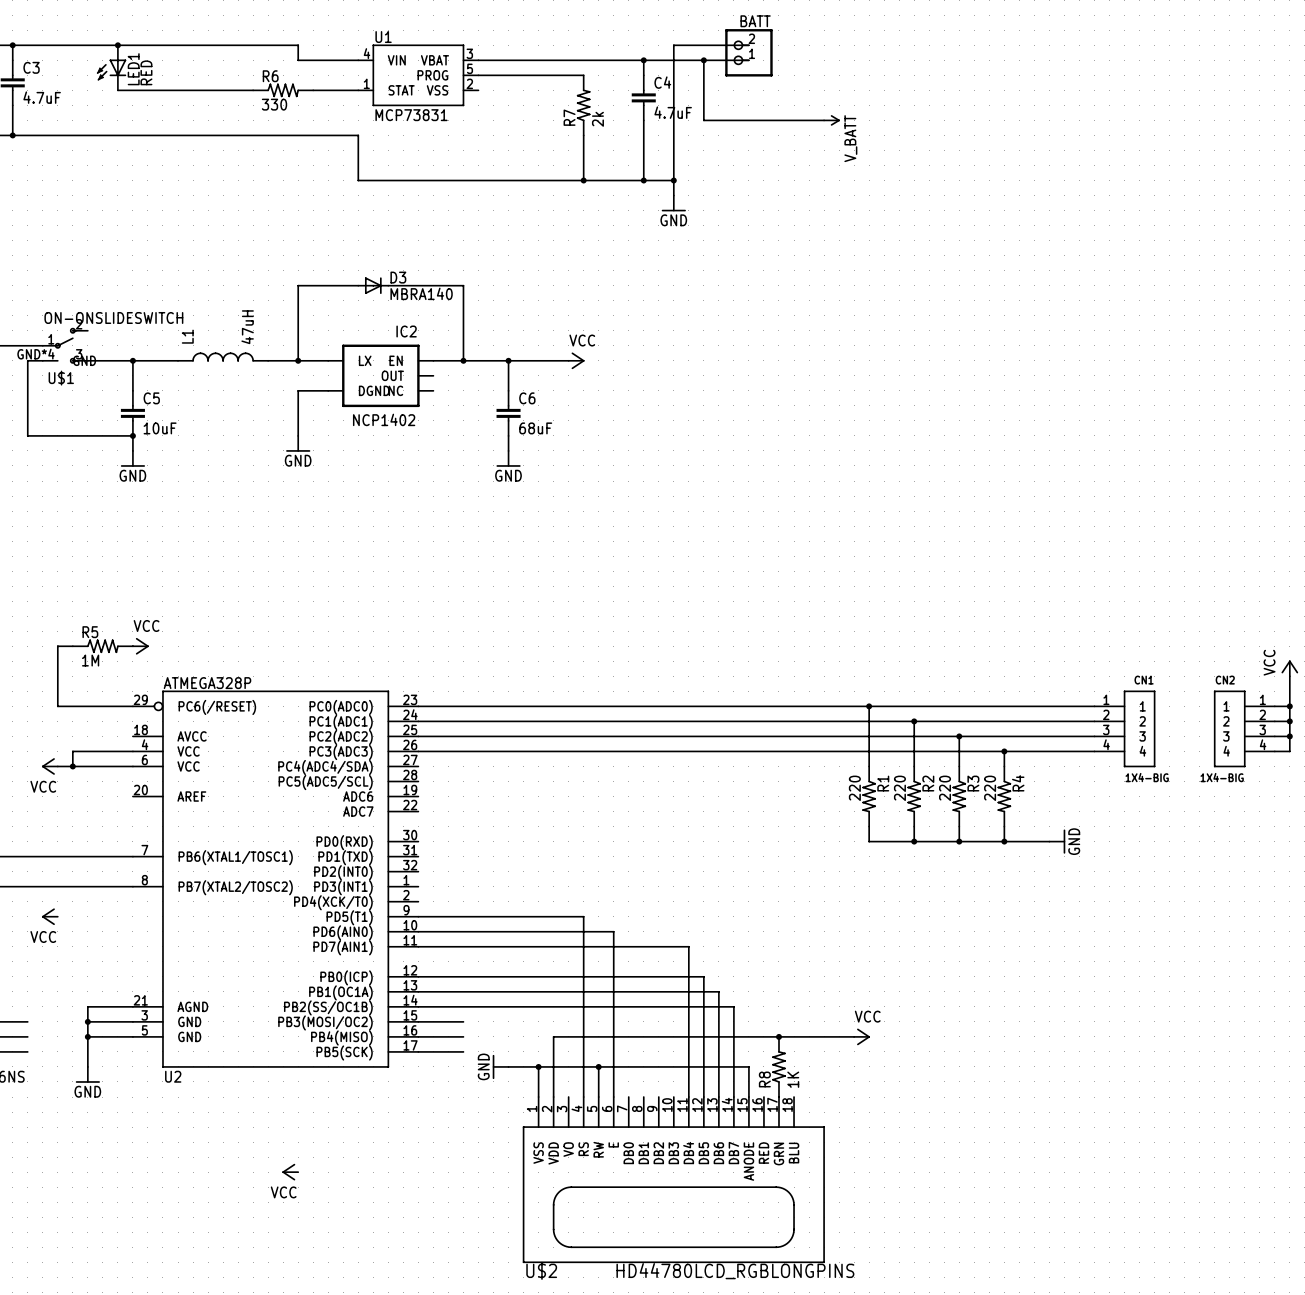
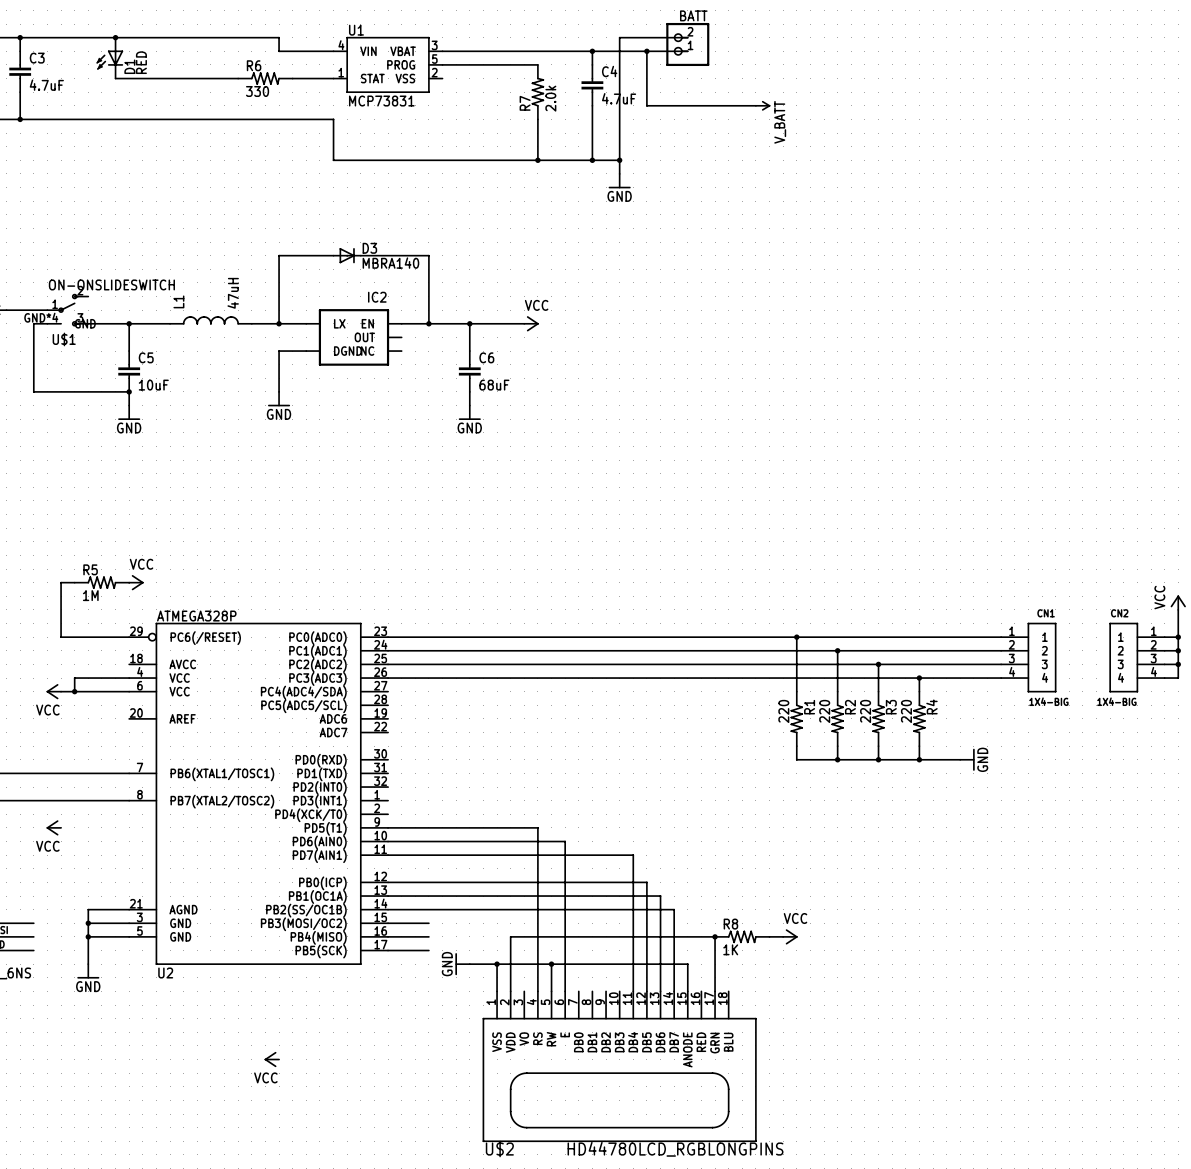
LED1 name: LED1 (133, 69) -> D1 (129, 66)
R7 value: 2k (597, 119) -> 2.0k (550, 98)
IC2 value: NCP1402 (384, 419) -> none
R8 rotation: 0° (778, 1066) -> 90° clockwise (742, 936)
R8 position: (778, 1066) -> (742, 936)

